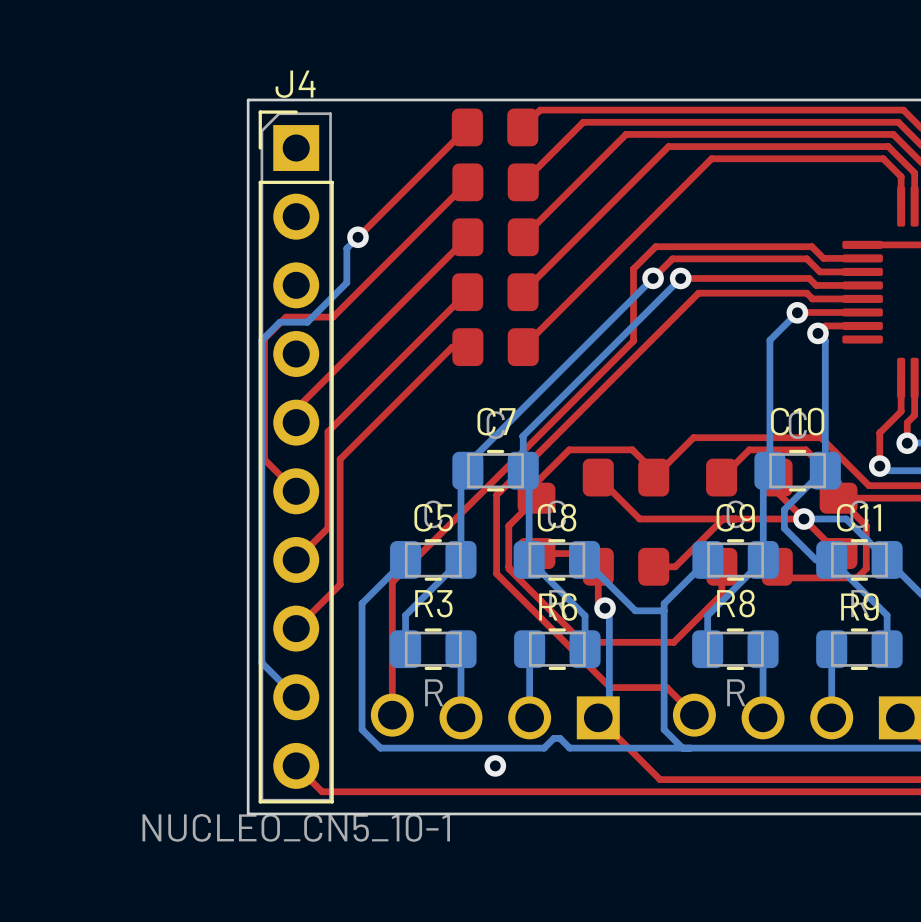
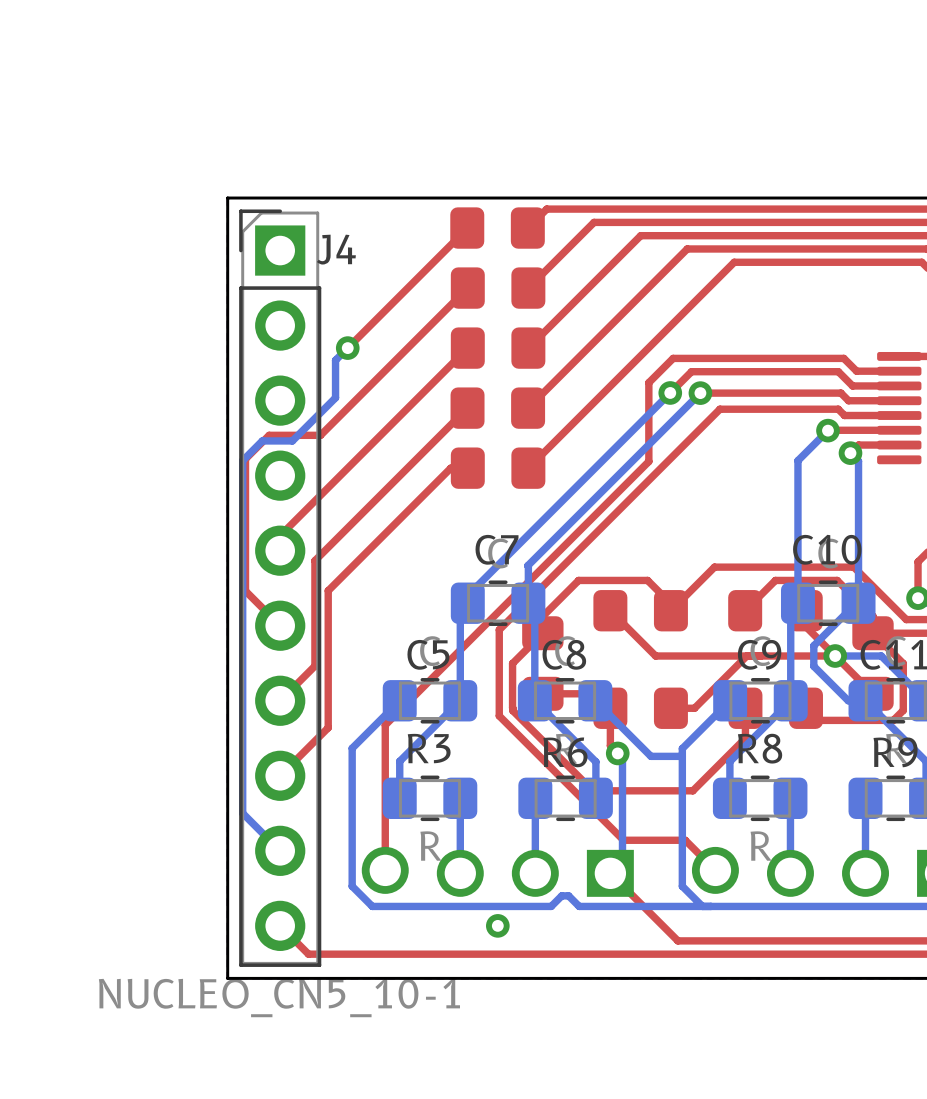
J4 name position: J4 (295, 84) -> J4 (336, 249)

